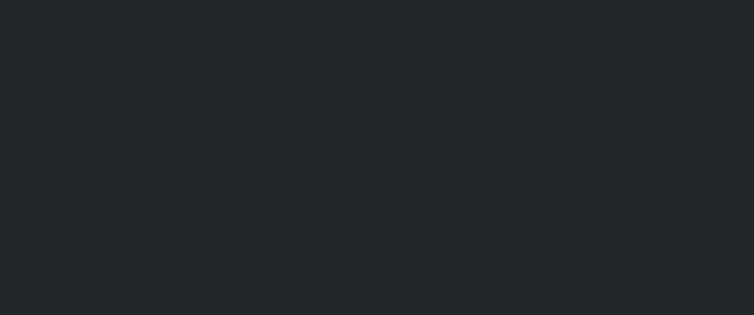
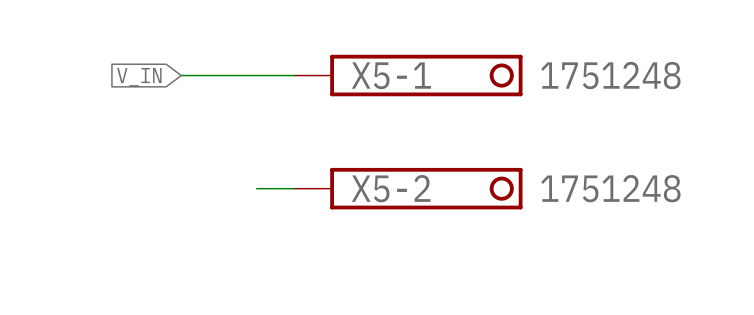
wire: none -> (181, 75) (294, 75)
X5-1: none -> 1751248 (408, 75)
global label: none -> V_IN (139, 77)
wire: none -> (256, 188) (294, 188)
X5-2: none -> 1751248 (408, 188)

